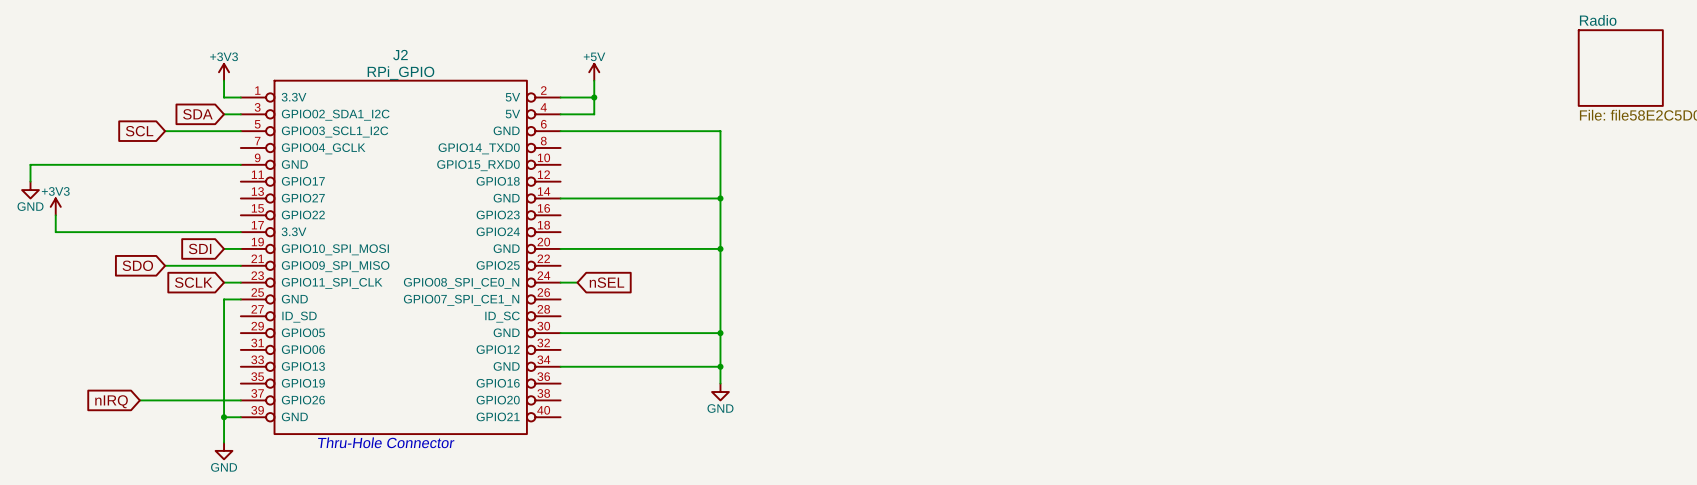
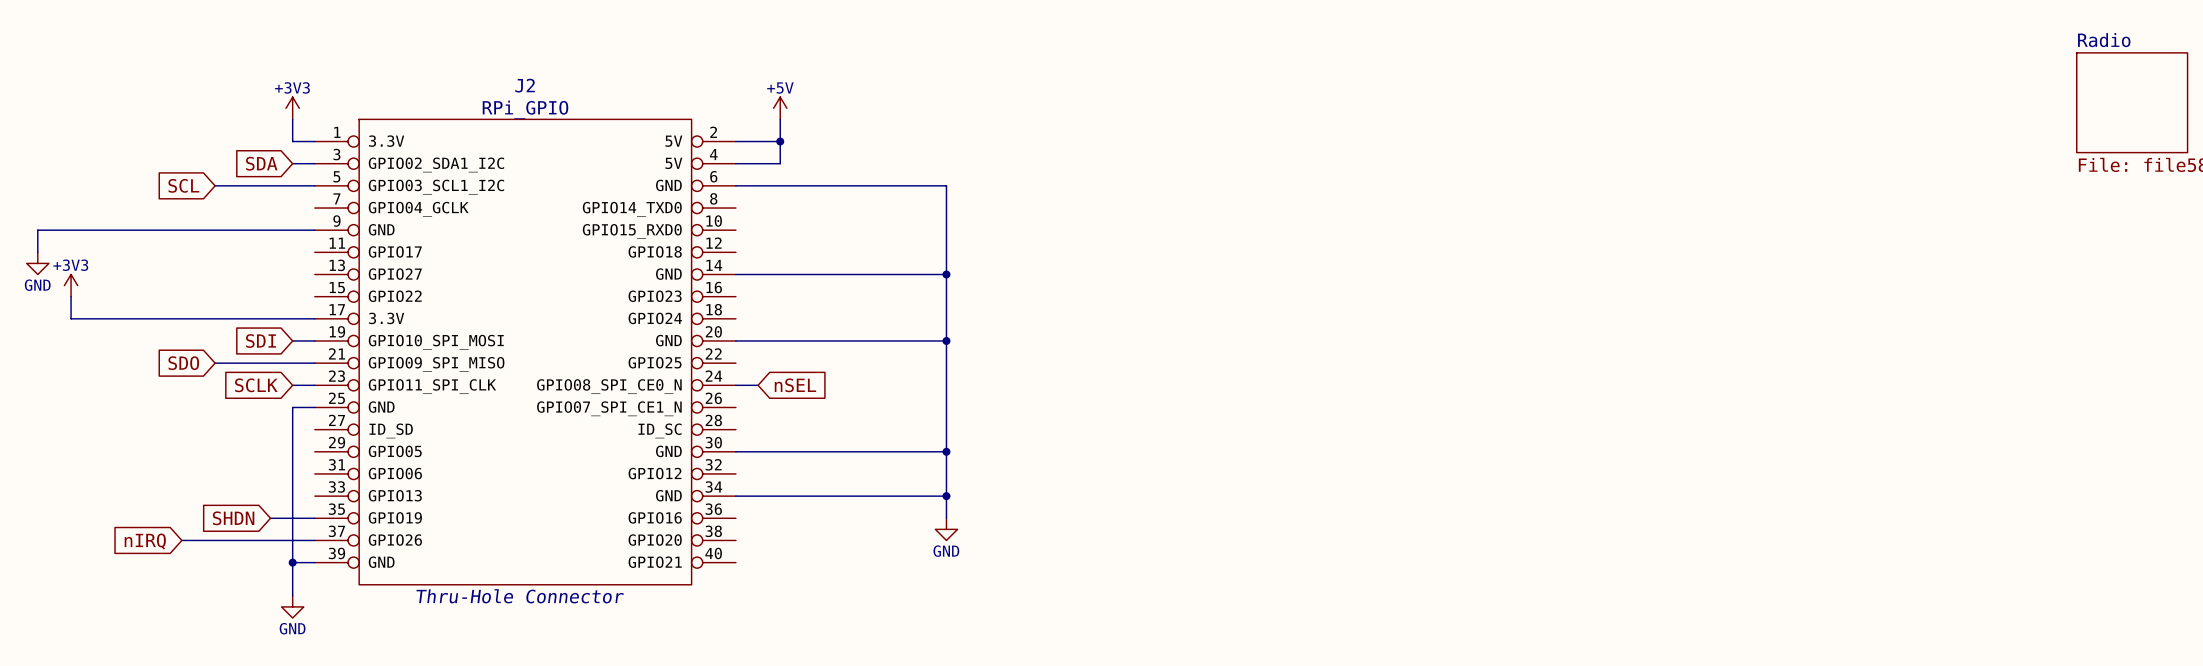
global label: none -> SHDN (233, 518)
wire: none -> (270, 518) (314, 518)

